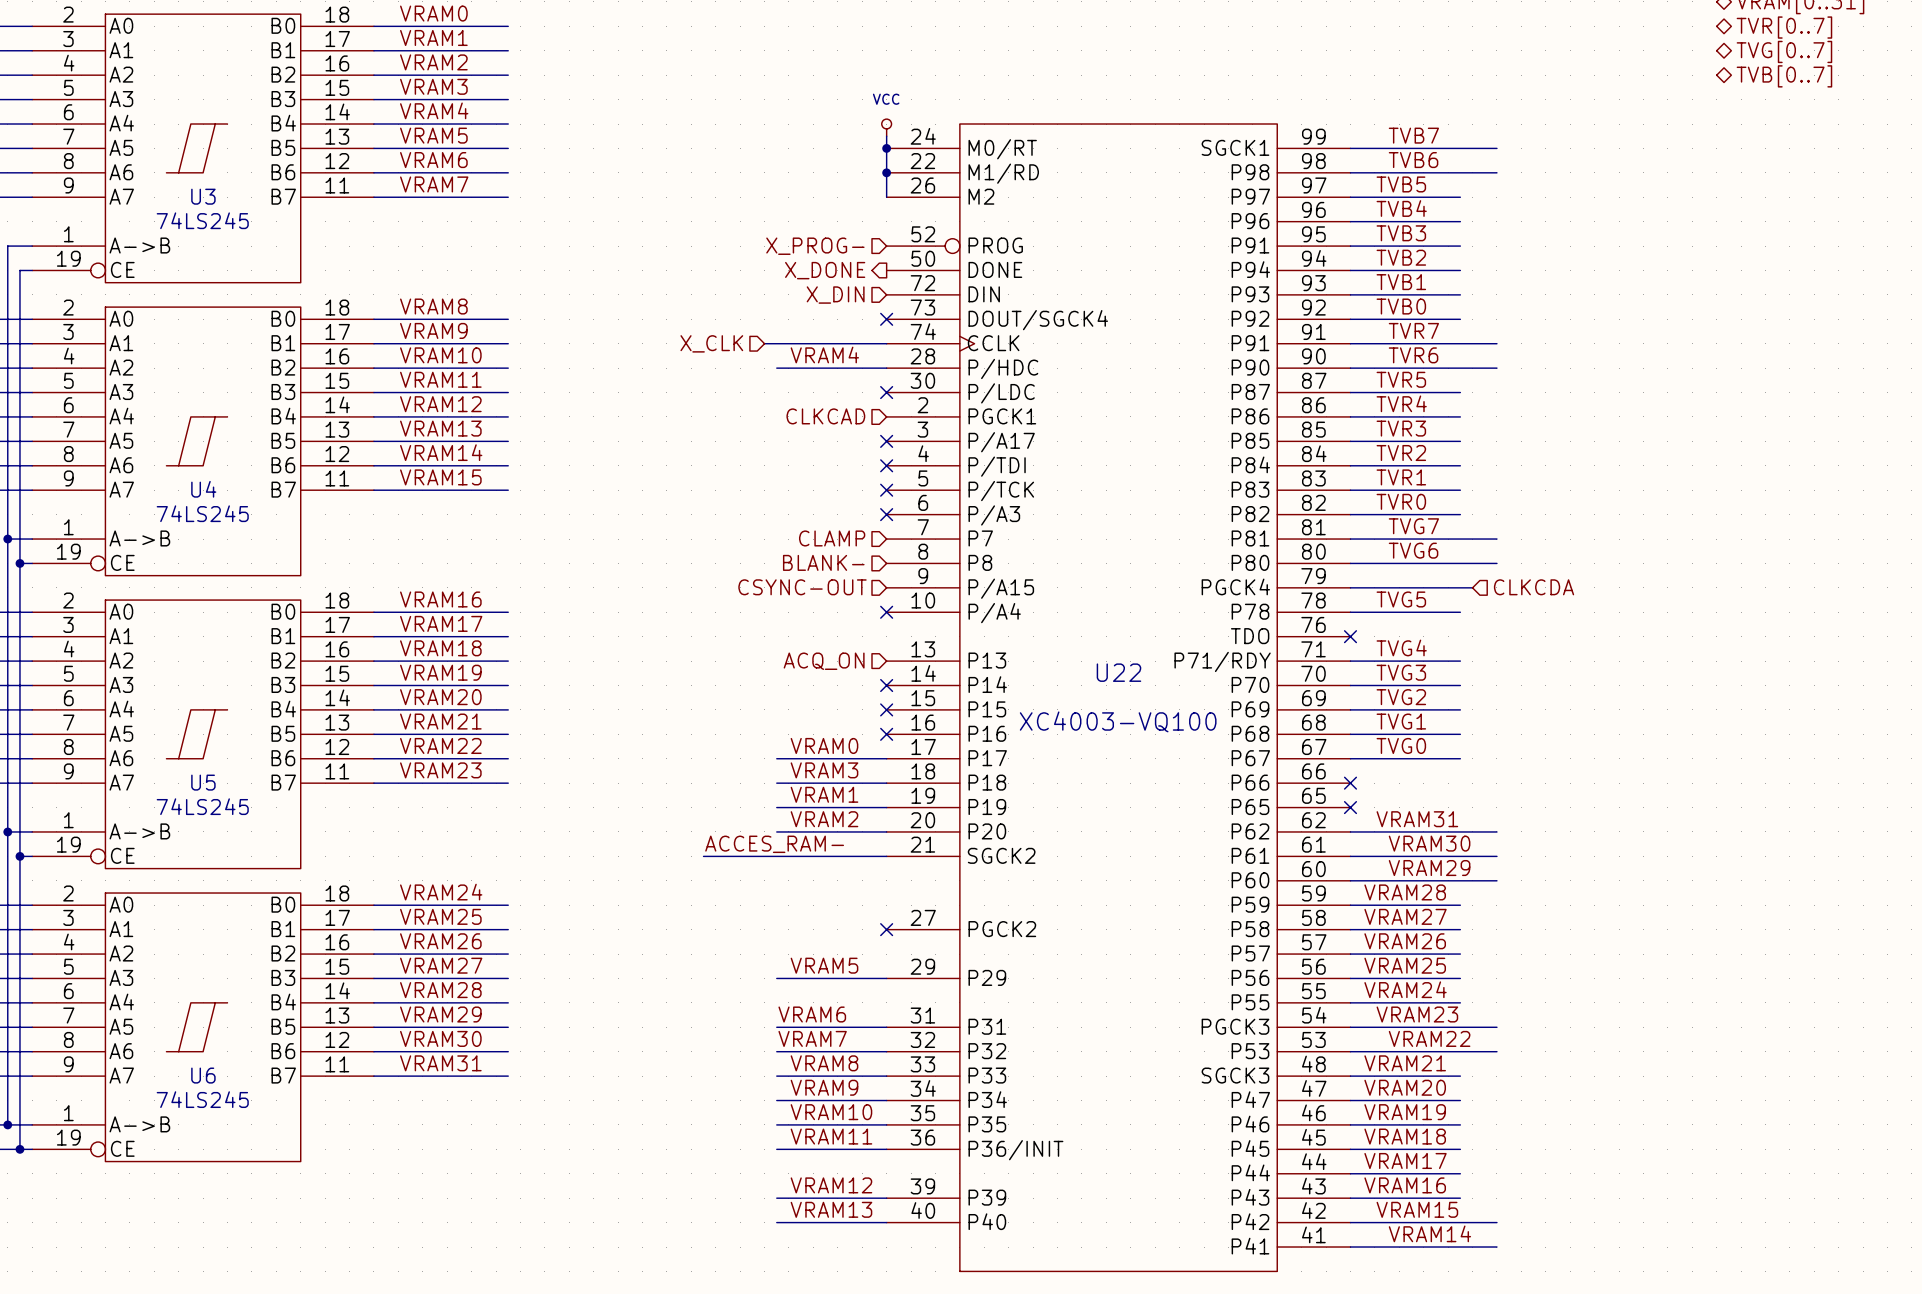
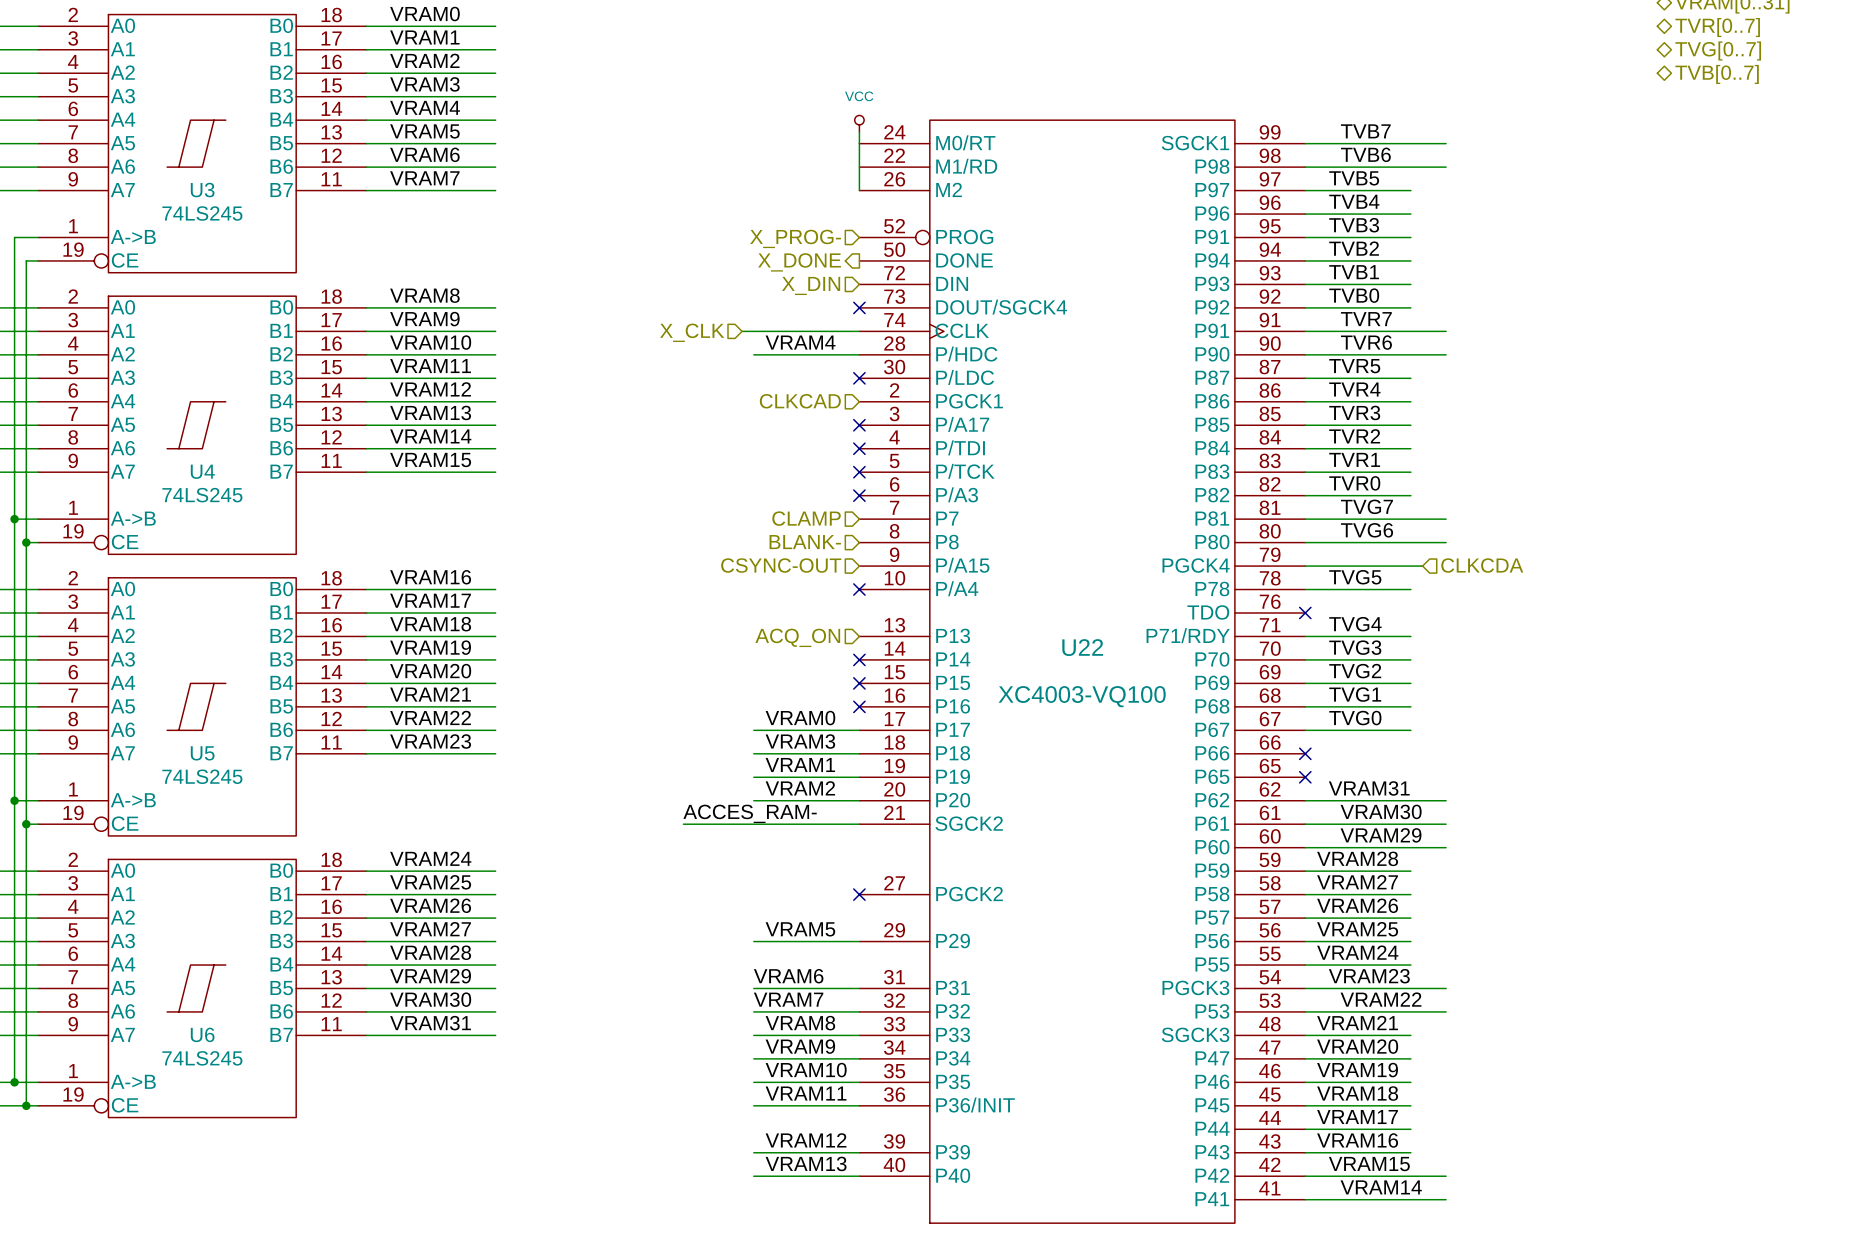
junction: (886, 148) -> none
junction: (886, 172) -> none

